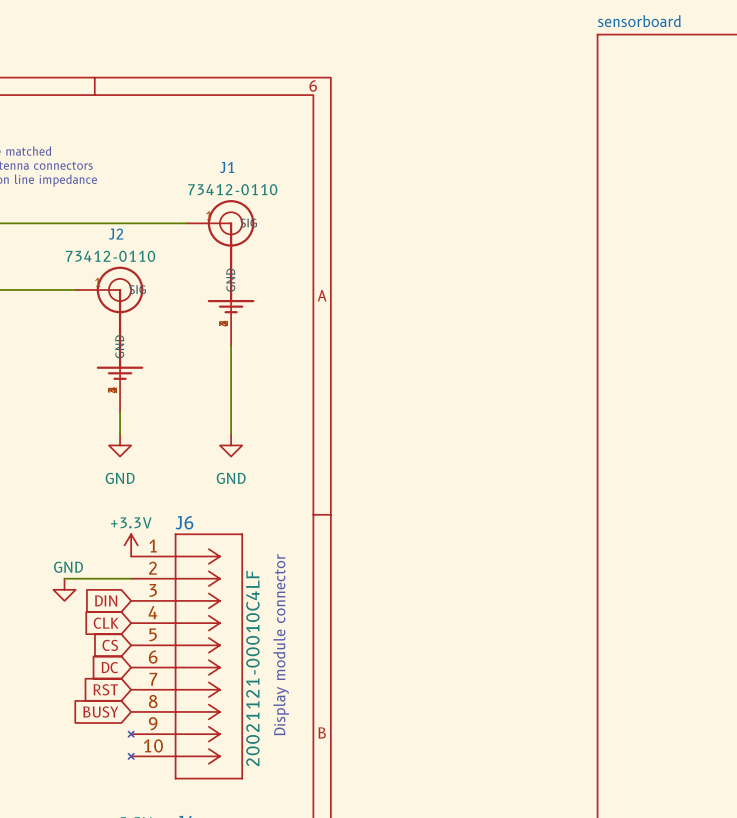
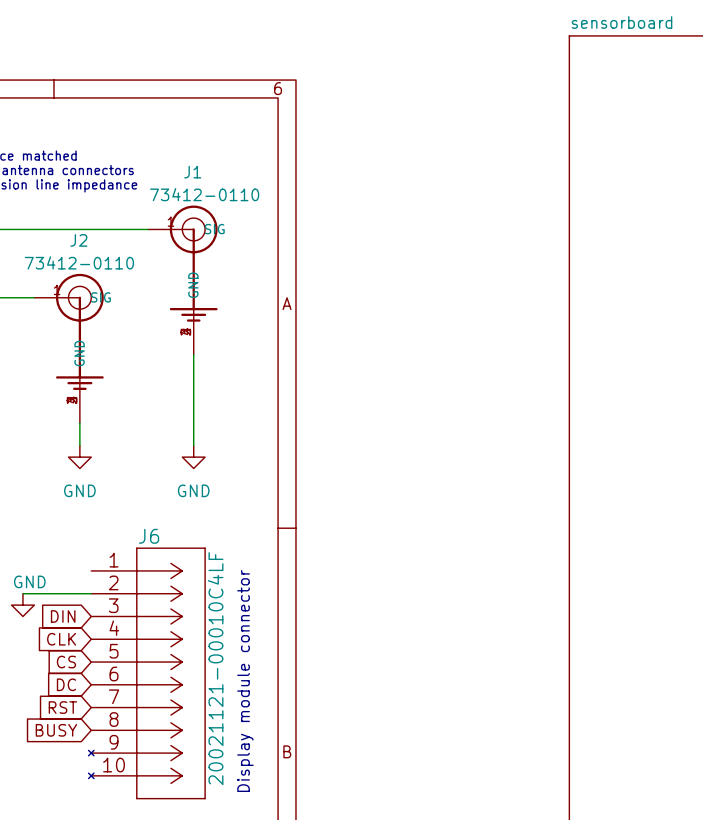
power symbol: +3.3V (131, 545) -> none

